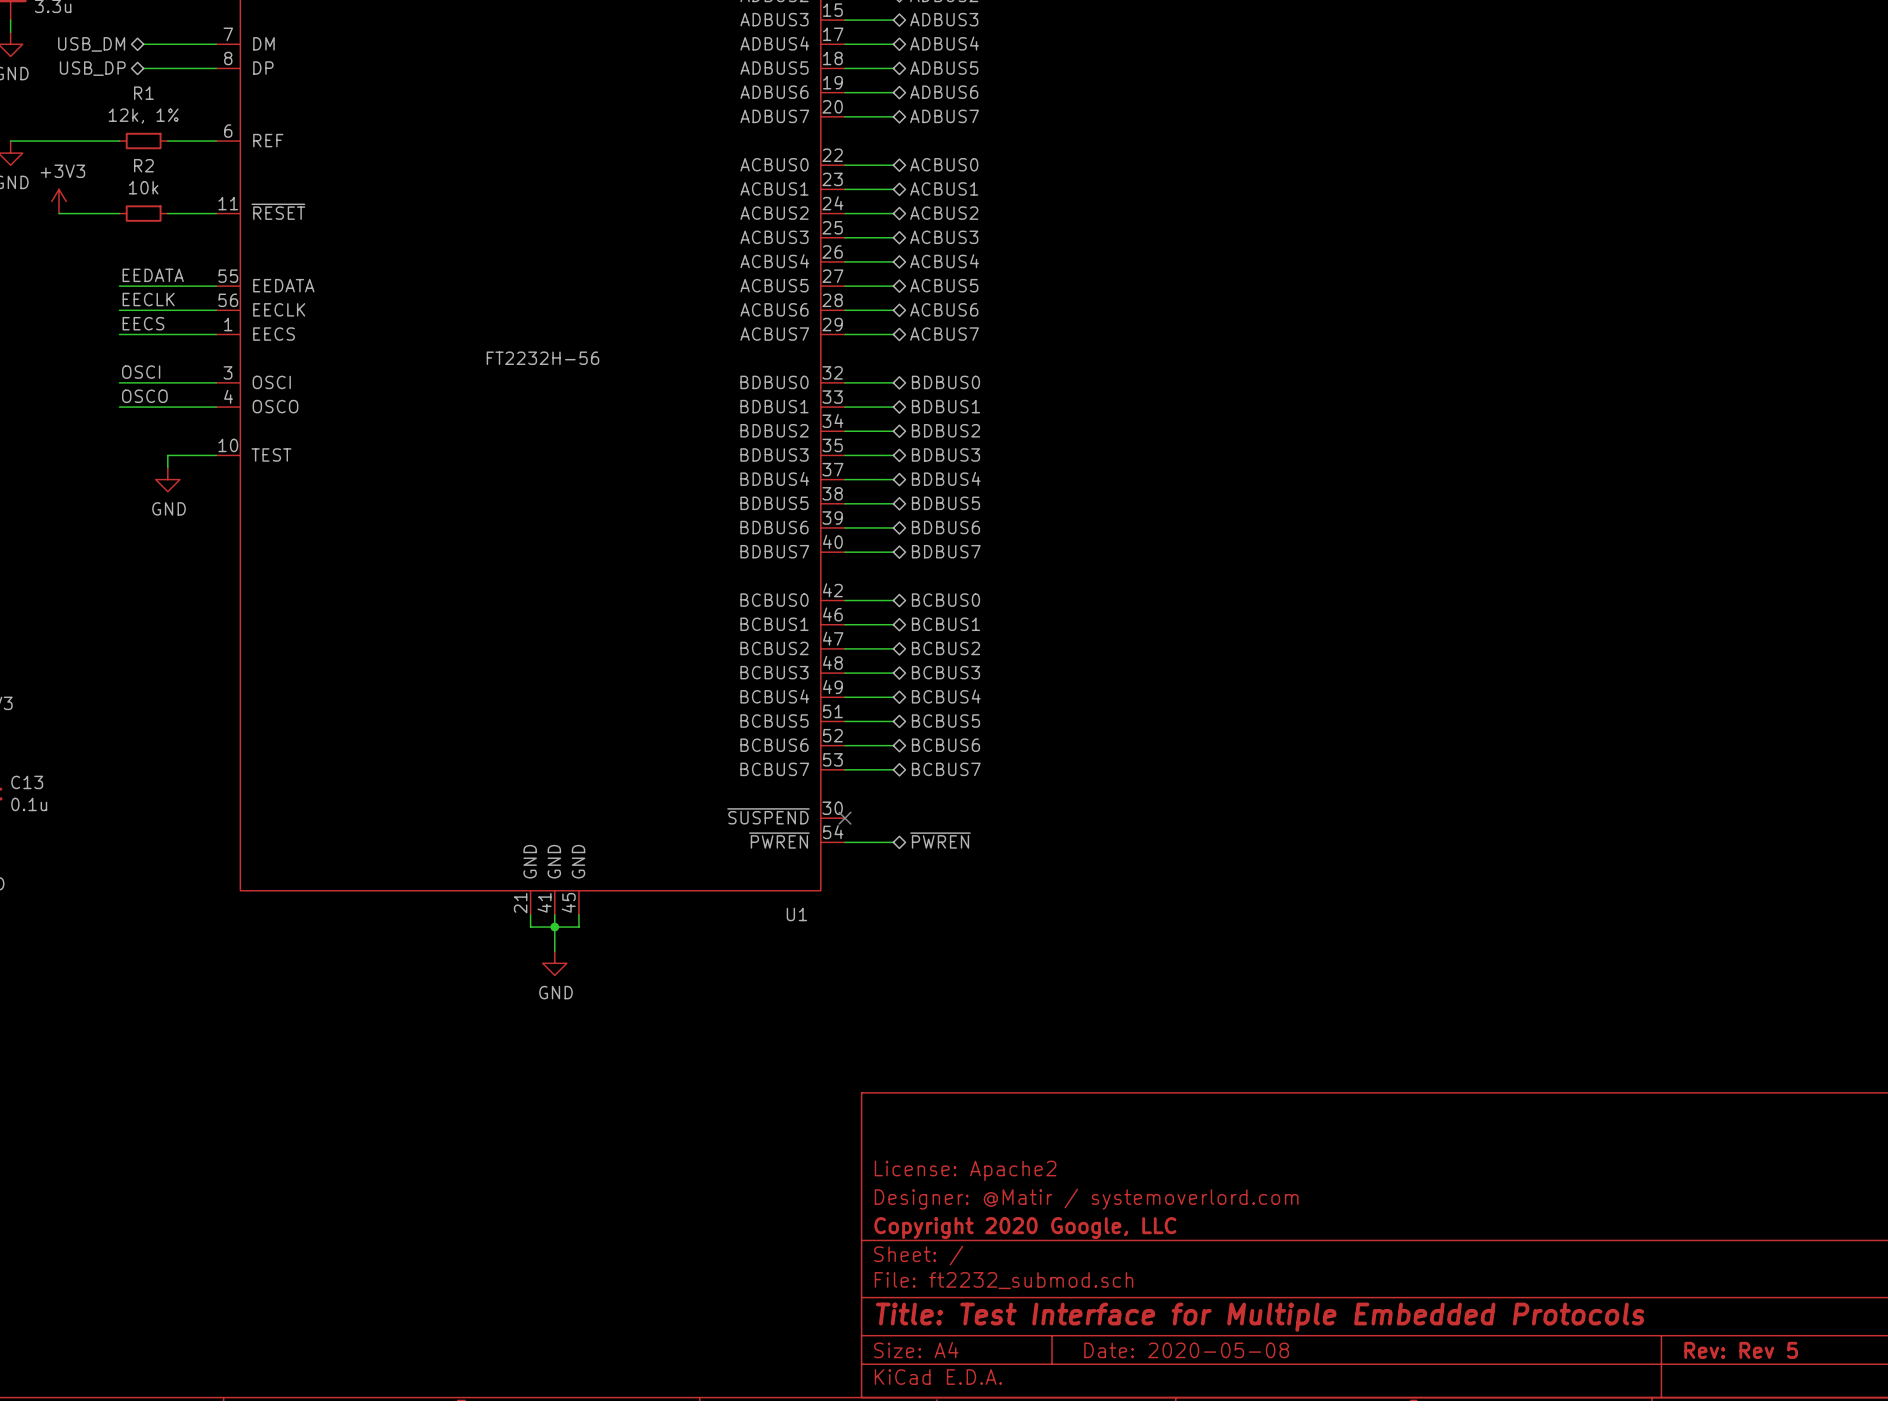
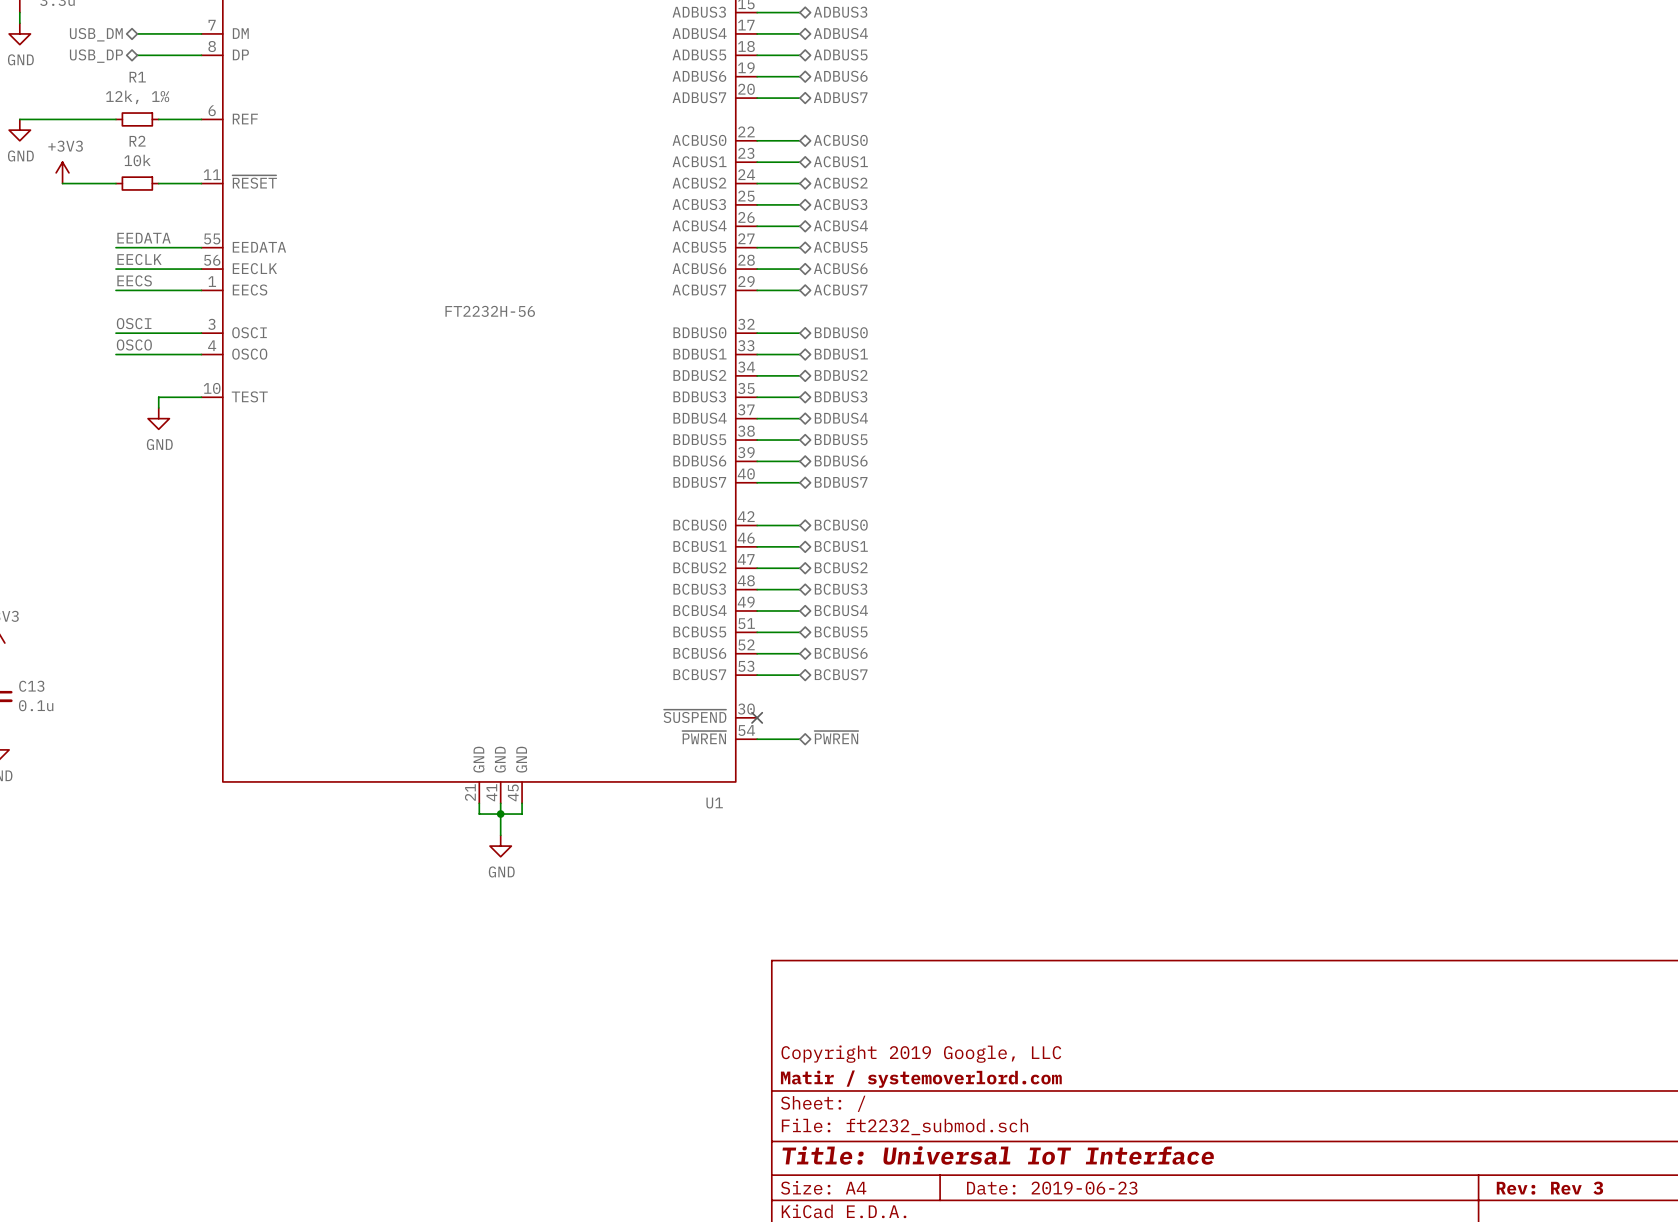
title block: License: Apache2 (965, 1170) -> none
title block: Designer: @Matir / systemoverlord.com (1086, 1199) -> Copyright 2019 Google, LLC (921, 1054)
title block: Copyright 2020 Google, LLC (1025, 1228) -> Matir / systemoverlord.com (921, 1079)
title block: Title: Test Interface for Multiple Embedded Protocols (1260, 1317) -> Title: Universal IoT Interface (998, 1155)
title block: Date: 2020-05-08 (1186, 1350) -> Date: 2019-06-23 (1052, 1188)
title block: Rev: Rev 5 (1741, 1350) -> Rev: Rev 3 (1549, 1188)

